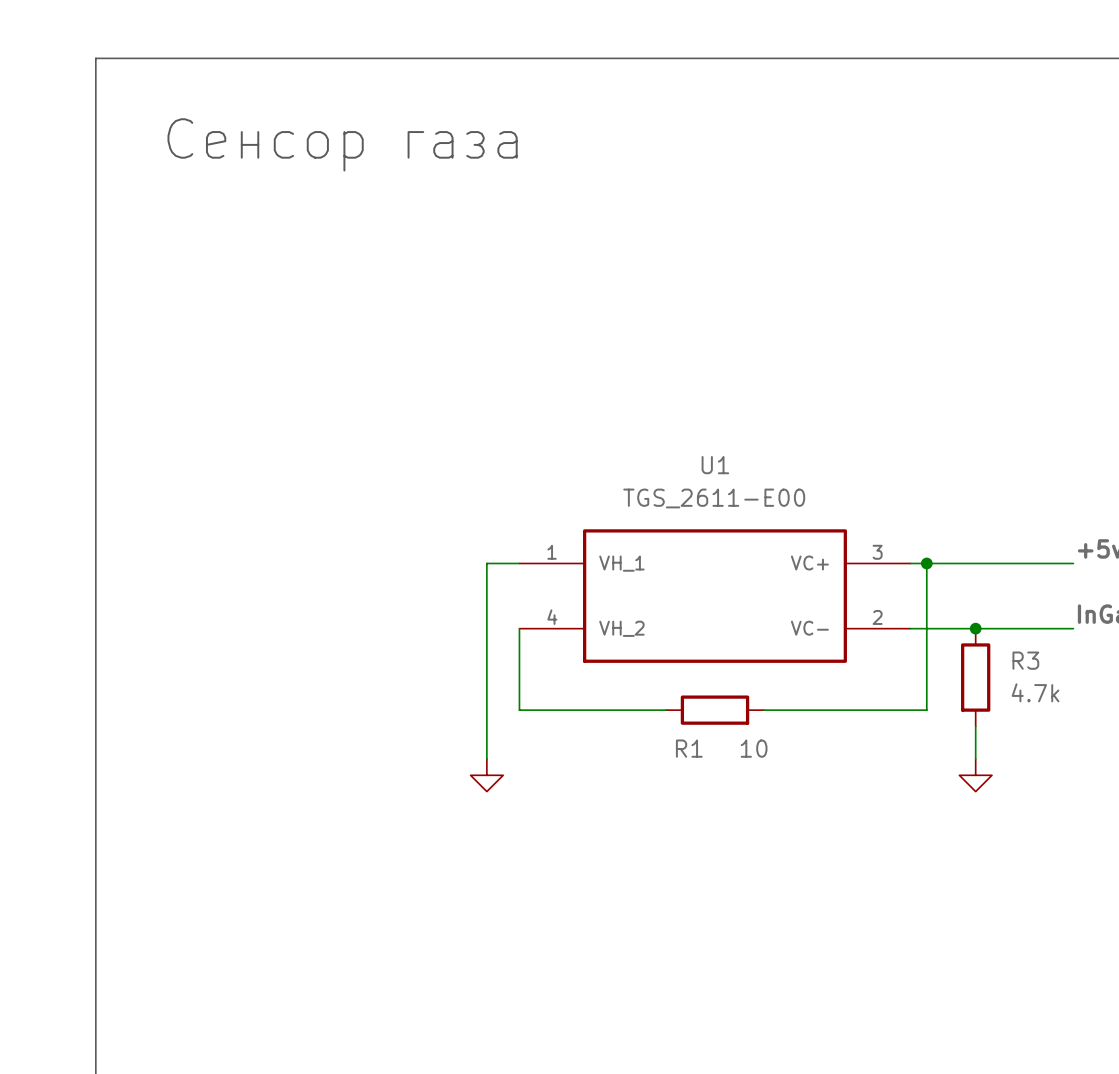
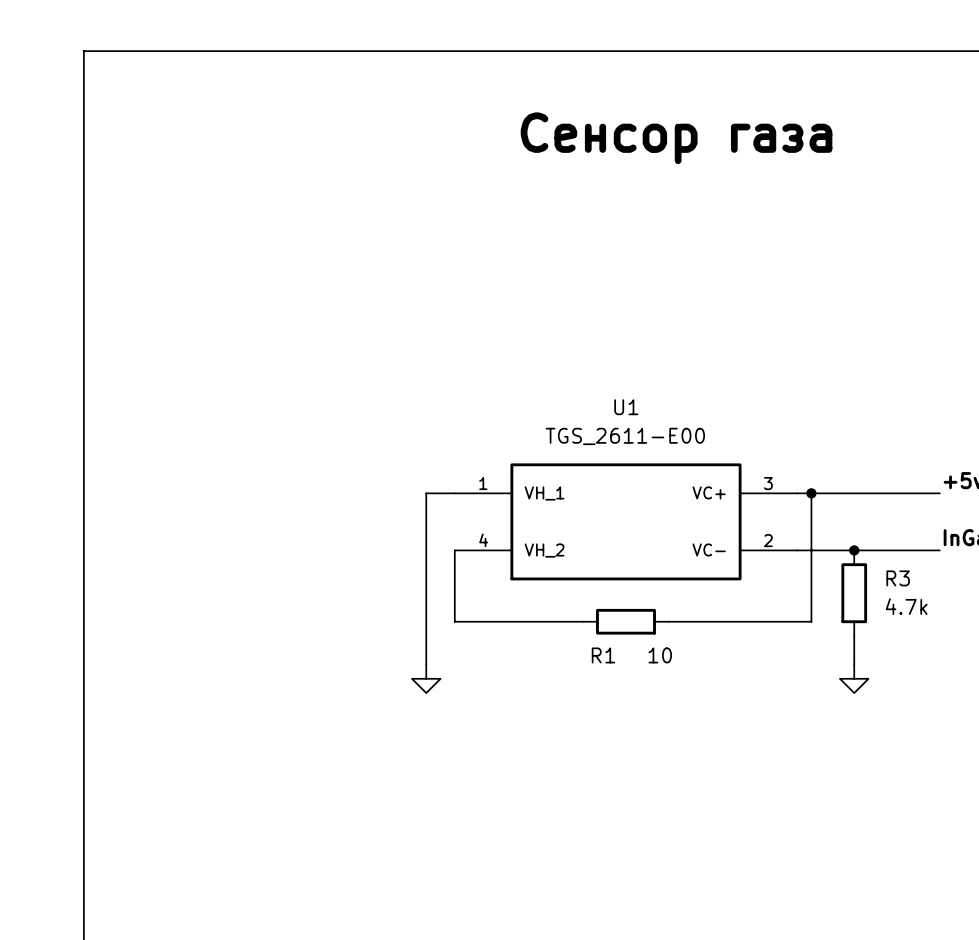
text: Сенсор газа (342, 144) -> none
text: none -> Сенсор газа (676, 138)

